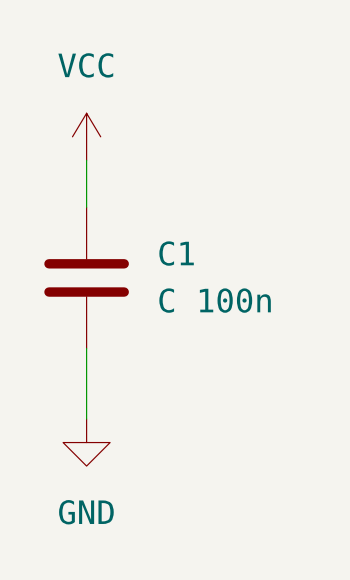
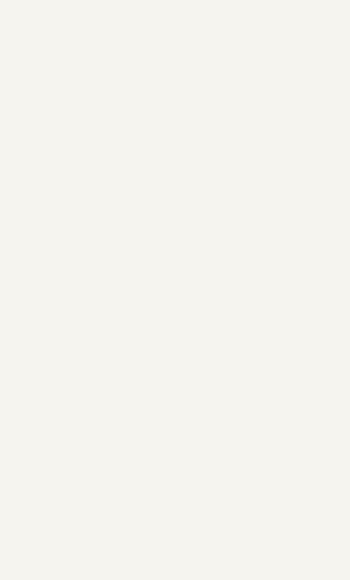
power symbol: VCC (86, 136) -> none
wire: (86, 160) (86, 207) -> none
C1: C 100n (86, 277) -> none
wire: (86, 348) (86, 419) -> none
power symbol: GND (86, 442) -> none

